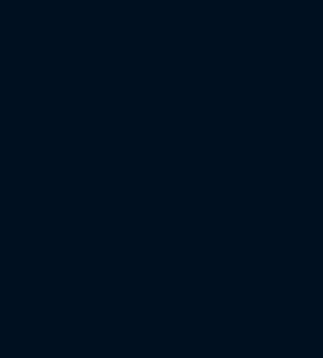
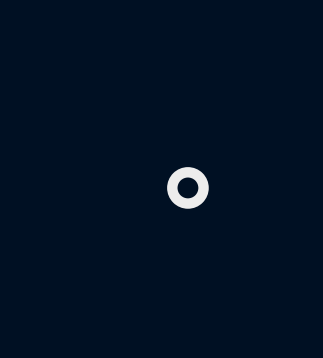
via: none -> (187, 187)

